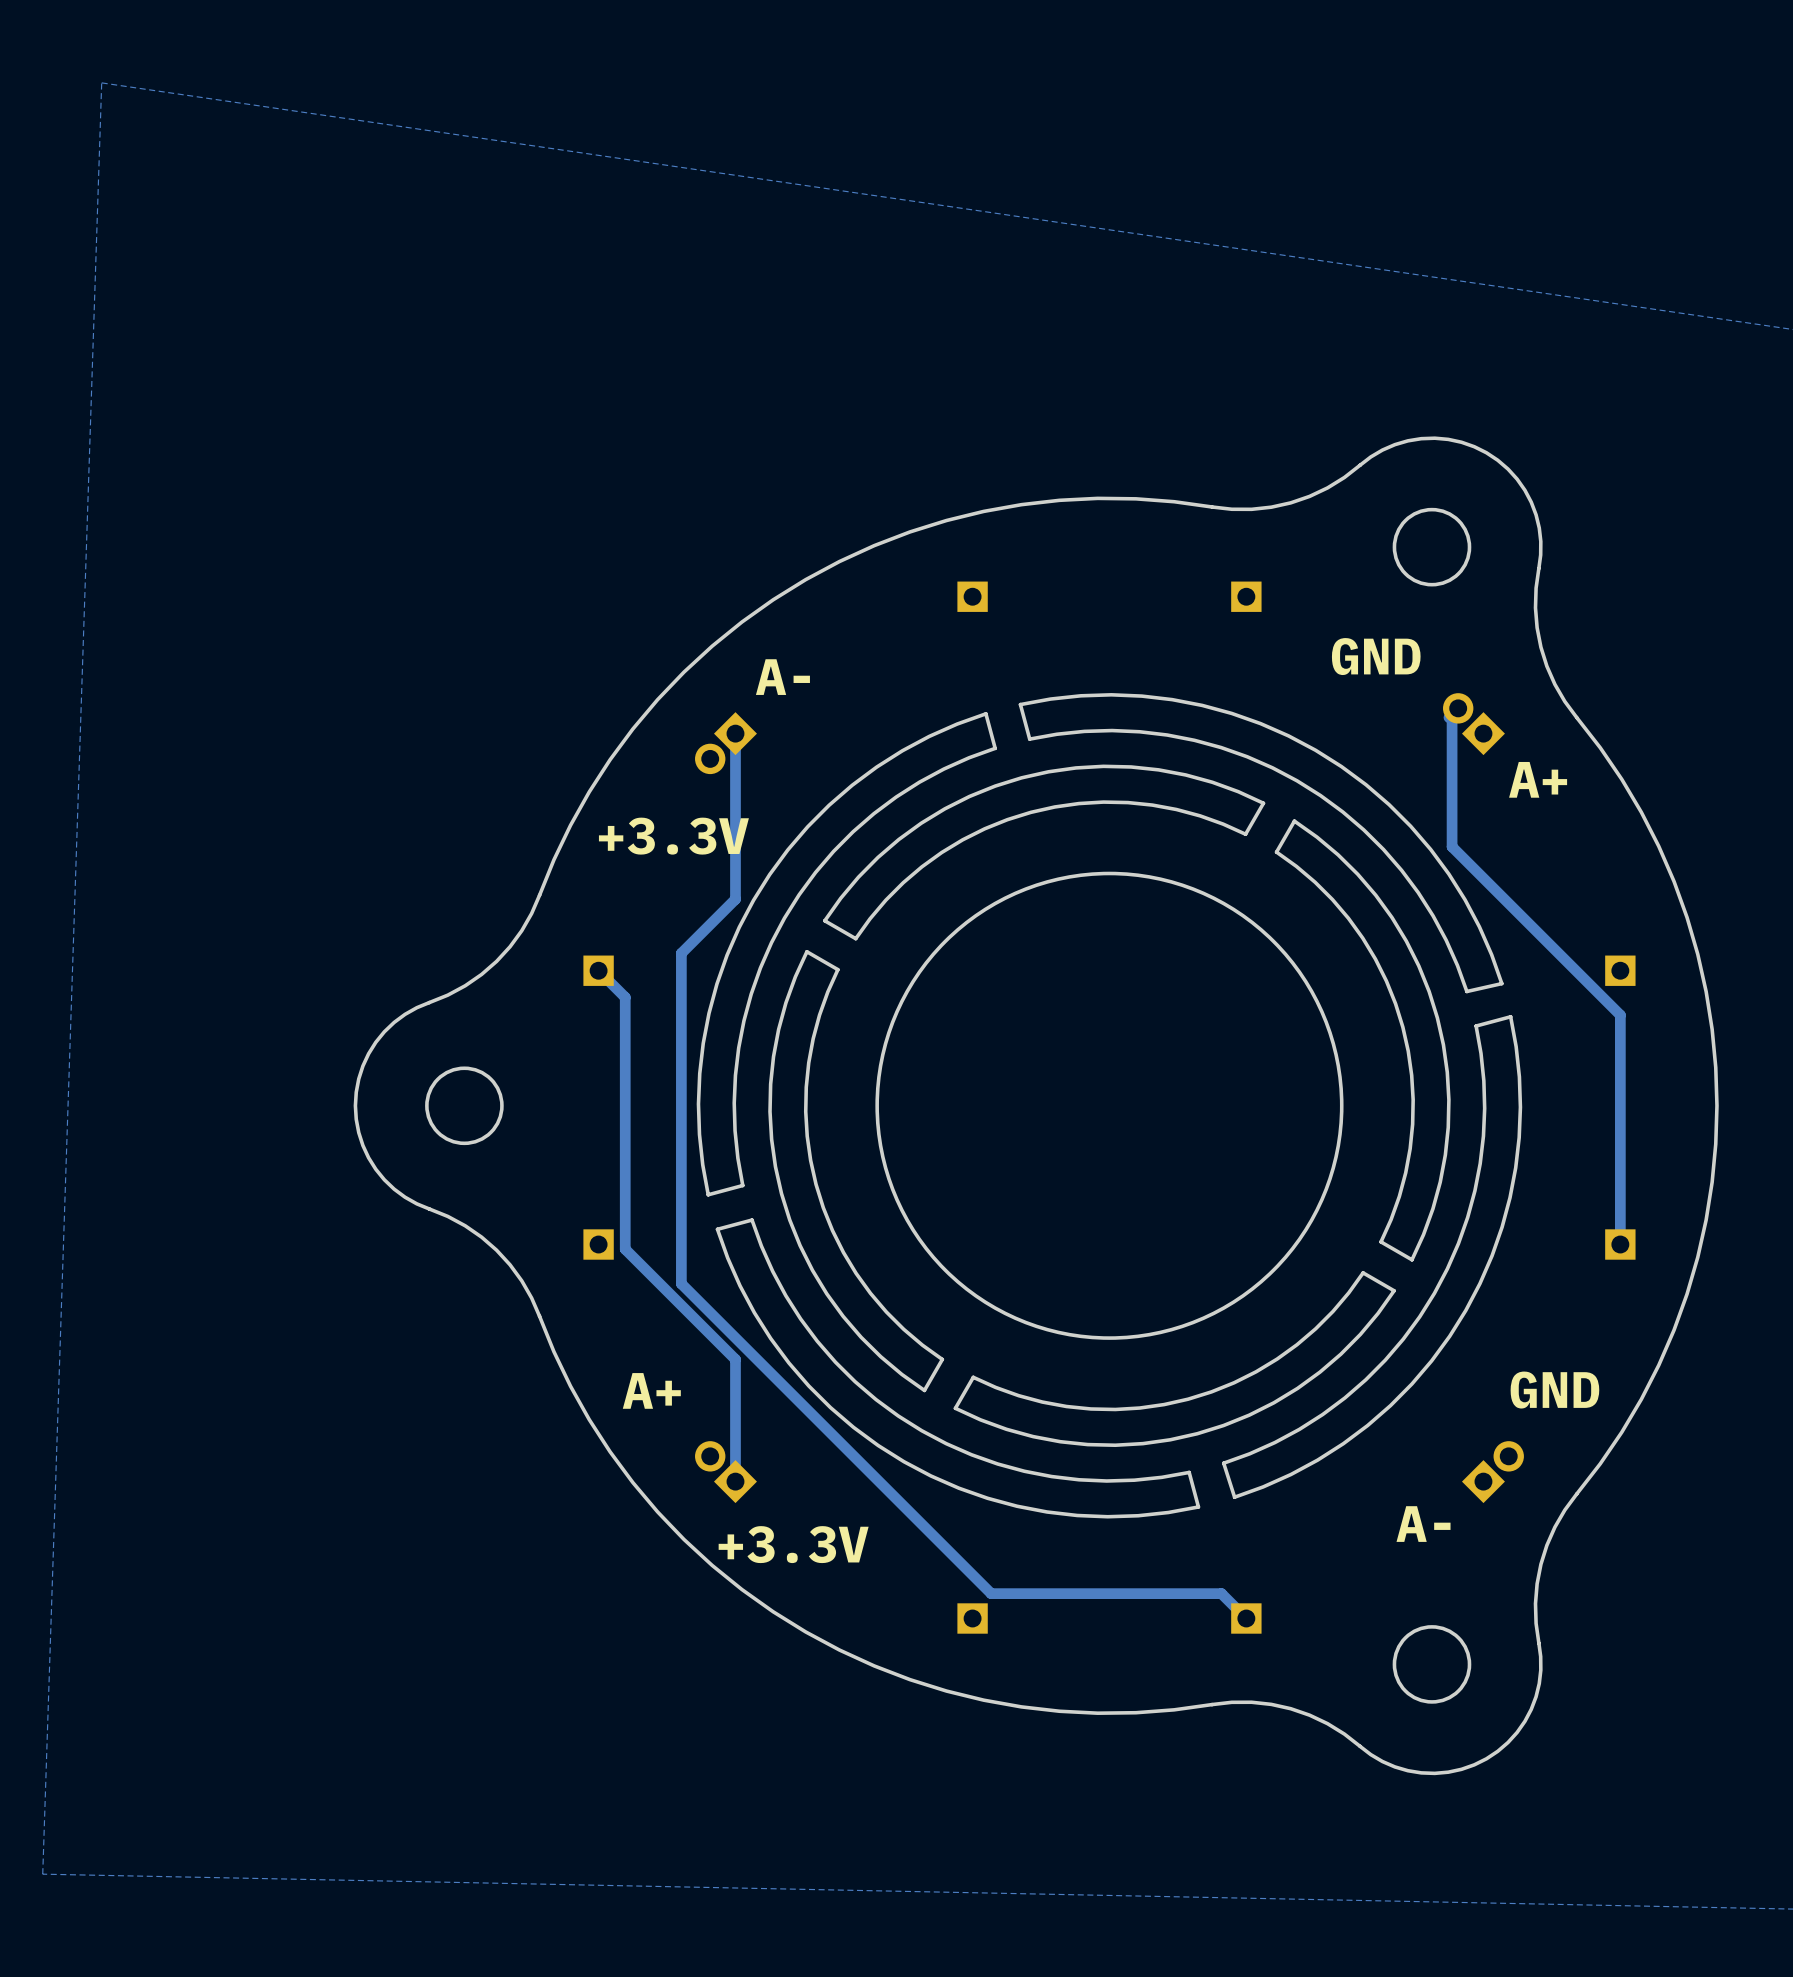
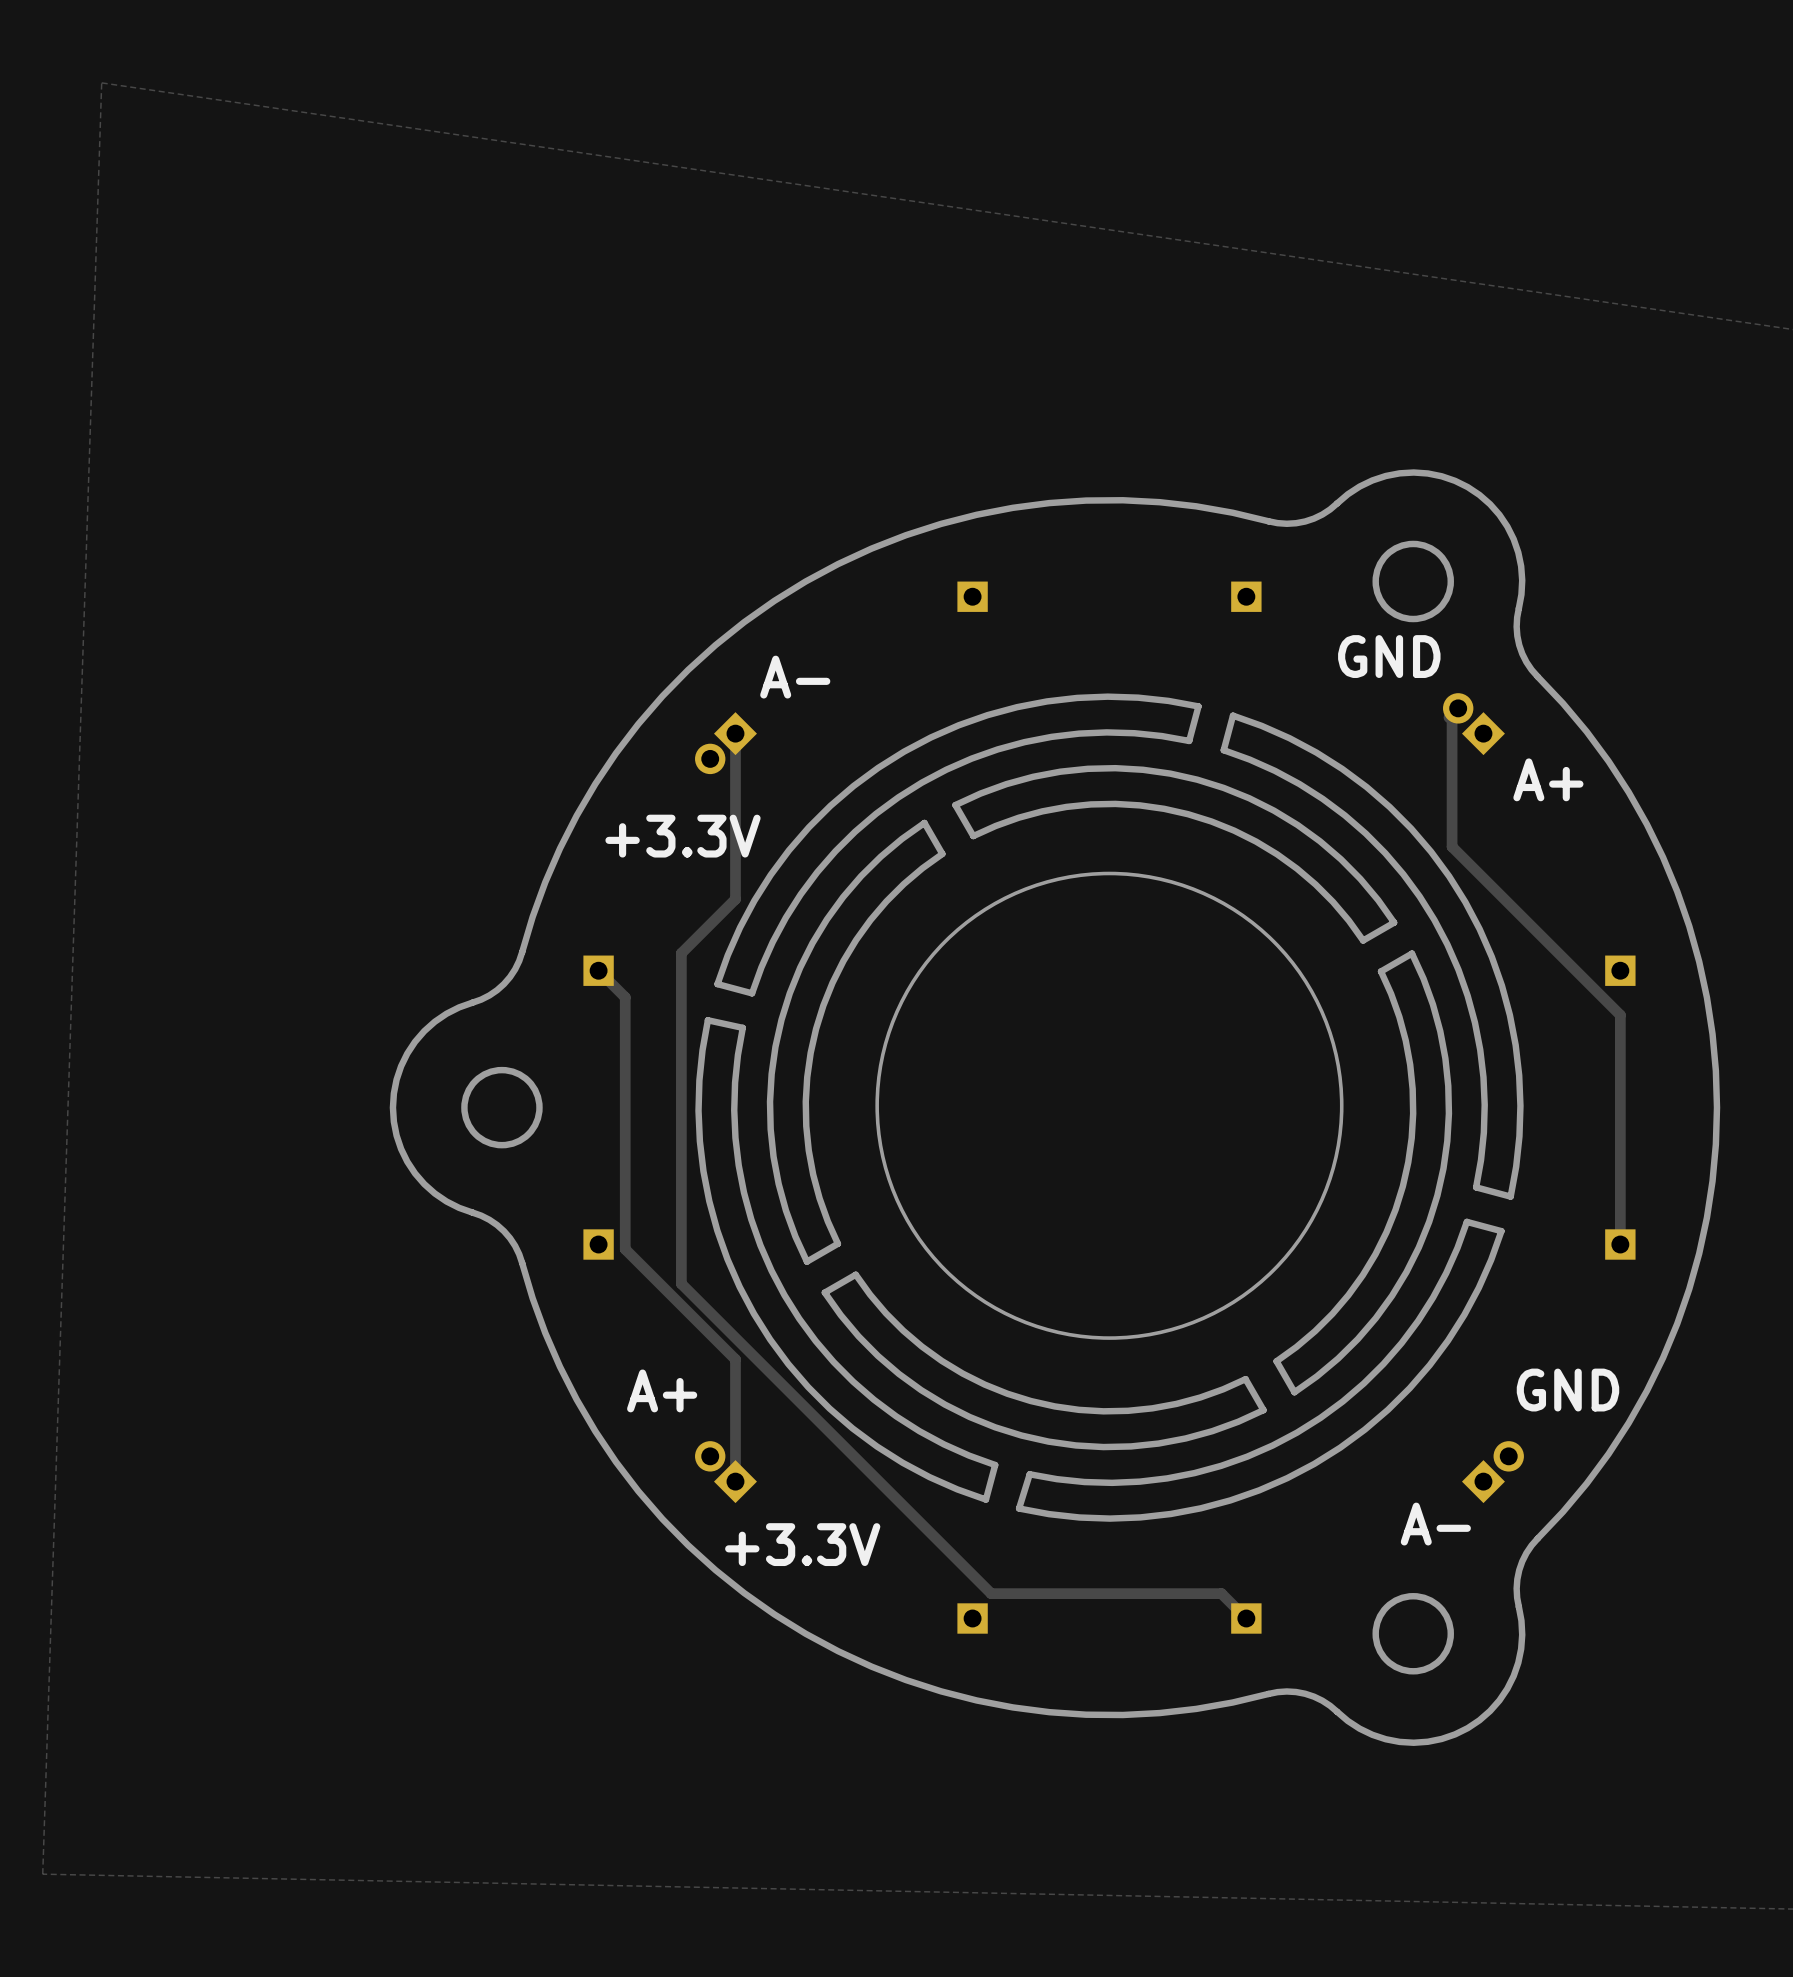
board edge: (1360, 465) (1382, 450) (1407, 440) (1421, 438) (1448, 439) (1474, 446) (1486, 452) (1508, 469) (1524, 490) (1536, 514) (1539, 528) (1540, 555) (1535, 607) (1537, 627) (1546, 666) (1564, 701) (1600, 747) (1641, 812) (1674, 881) (1697, 954) (1712, 1029) (1715, 1067) (1715, 1144) (1706, 1219) (1697, 1257) (1674, 1330) (1641, 1399) (1600, 1463) (1564, 1510) (1546, 1545) (1537, 1583) (1536, 1623) (1540, 1670) (1539, 1683) (1531, 1709) (1517, 1732) (1508, 1742) (1486, 1758) (1461, 1769) (1434, 1773) (1407, 1770) (1382, 1761) (1327, 1723) (1290, 1708) (1251, 1702) (1231, 1702) (1135, 1712) (1059, 1711) (1021, 1706) (983, 1700) (910, 1679) (839, 1650) (805, 1631) (741, 1589) (712, 1565) (657, 1511) (610, 1451) (589, 1419) (553, 1351) (531, 1298) (510, 1264) (496, 1250) (465, 1225) (405, 1197) (384, 1179) (375, 1169) (362, 1145) (358, 1132) (355, 1105) (358, 1078) (362, 1066) (375, 1042) (384, 1031) (405, 1014) (465, 985) (496, 961) (510, 946) (531, 913) (553, 859) (589, 791) (632, 728) (684, 672) (712, 646) (773, 599) (839, 561) (874, 545) (946, 520) (983, 511) (1059, 500) (1097, 498) (1174, 501) (1231, 509) (1271, 507) (1309, 496) (1327, 487) (1360, 465) -> (1337, 503) (1347, 494) (1372, 480) (1385, 476) (1413, 472) (1441, 476) (1467, 487) (1490, 504) (1499, 514) (1513, 539) (1521, 566) (1521, 594) (1516, 626) (1522, 653) (1531, 669) (1563, 703) (1608, 761) (1646, 824) (1677, 891) (1689, 926) (1706, 997) (1715, 1070) (1716, 1107) (1715, 1144) (1706, 1217) (1699, 1253) (1677, 1323) (1646, 1390) (1608, 1453) (1563, 1511) (1531, 1545) (1522, 1561) (1516, 1588) (1521, 1620) (1521, 1648) (1513, 1676) (1507, 1688) (1490, 1711) (1479, 1720) (1455, 1734) (1441, 1738) (1413, 1742) (1385, 1739) (1359, 1728) (1322, 1700) (1296, 1692) (1277, 1692) (1232, 1702) (1159, 1713) (1086, 1714) (1049, 1712) (976, 1700) (905, 1680) (838, 1651) (774, 1614) (715, 1570) (688, 1545) (638, 1491) (595, 1431) (559, 1366) (532, 1298) (519, 1254) (510, 1238) (489, 1219) (459, 1207) (434, 1193) (415, 1173) (407, 1161) (396, 1135) (392, 1107) (393, 1093) (401, 1066) (415, 1041) (434, 1021) (459, 1007) (489, 995) (510, 977) (519, 960) (532, 916) (559, 848) (595, 783) (638, 724) (688, 669) (715, 645) (774, 600) (805, 581) (838, 564) (905, 535) (976, 514) (1012, 507) (1086, 500) (1159, 502) (1196, 506) (1286, 523) (1313, 518) (1337, 503)
round board edge: [1392, 507, 1472, 587] -> none
round board edge: none -> [1372, 540, 1454, 623]
board edge: (1020, 704) (1029, 739) (1084, 731) (1112, 730) (1167, 735) (1221, 747) (1247, 756) (1297, 780) (1342, 811) (1363, 829) (1401, 870) (1418, 892) (1446, 940) (1466, 991) (1501, 983) (1479, 926) (1448, 873) (1430, 849) (1389, 804) (1365, 784) (1315, 750) (1260, 723) (1202, 705) (1172, 699) (1111, 694) (1080, 695) (1020, 704) -> none
board edge: none -> (1198, 706) (1189, 740) (1134, 733) (1106, 732) (1051, 736) (997, 749) (946, 769) (921, 782) (898, 797) (855, 831) (817, 872) (800, 894) (772, 942) (752, 993) (717, 984) (740, 927) (754, 900) (788, 850) (830, 805) (878, 767) (903, 751) (958, 725) (1017, 707) (1046, 701) (1077, 697) (1138, 697) (1198, 706)
board edge: (985, 713) (995, 748) (969, 757) (919, 782) (874, 813) (833, 851) (799, 894) (784, 918) (771, 942) (751, 994) (738, 1047) (734, 1103) (735, 1130) (742, 1185) (708, 1194) (699, 1134) (698, 1104) (703, 1043) (709, 1013) (727, 955) (753, 900) (769, 874) (807, 826) (852, 785) (876, 767) (929, 736) (985, 713) -> none
board edge: none -> (1233, 715) (1223, 750) (1275, 770) (1299, 784) (1344, 815) (1385, 853) (1403, 874) (1434, 920) (1447, 944) (1467, 995) (1480, 1049) (1483, 1077) (1483, 1132) (1476, 1187) (1510, 1196) (1516, 1166) (1520, 1105) (1515, 1045) (1501, 985) (1491, 957) (1465, 902) (1449, 876) (1411, 828) (1366, 787) (1316, 752) (1289, 738) (1233, 715)
board edge: (1263, 803) (1245, 834) (1200, 815) (1152, 805) (1103, 802) (1054, 806) (1030, 812) (984, 828) (941, 852) (903, 882) (885, 900) (855, 938) (824, 920) (858, 877) (877, 857) (921, 823) (969, 796) (1021, 777) (1075, 767) (1131, 766) (1185, 774) (1238, 791) (1263, 803) -> (955, 805) (1006, 784) (1060, 771) (1115, 768) (1170, 773) (1197, 779) (1249, 798) (1297, 825) (1320, 841) (1360, 878) (1394, 922) (1363, 940) (1332, 901) (1315, 884) (1277, 854) (1234, 830) (1188, 814) (1139, 805) (1115, 803) (1066, 806) (1018, 817) (973, 836) (955, 805)
board edge: (1294, 821) (1276, 852) (1315, 882) (1332, 899) (1362, 938) (1386, 981) (1402, 1027) (1411, 1075) (1412, 1124) (1410, 1148) (1399, 1196) (1380, 1241) (1411, 1259) (1432, 1208) (1445, 1154) (1448, 1099) (1447, 1072) (1437, 1017) (1418, 965) (1392, 917) (1357, 874) (1338, 854) (1294, 821) -> (1412, 953) (1432, 1004) (1440, 1031) (1448, 1085) (1447, 1141) (1437, 1195) (1418, 1247) (1392, 1295) (1375, 1318) (1338, 1358) (1294, 1392) (1276, 1361) (1315, 1331) (1348, 1295) (1362, 1275) (1386, 1232) (1402, 1186) (1411, 1138) (1412, 1089) (1410, 1064) (1399, 1016) (1381, 971) (1412, 953)
board edge: (806, 951) (837, 969) (827, 991) (813, 1038) (806, 1087) (807, 1136) (816, 1184) (823, 1207) (843, 1252) (870, 1293) (903, 1329) (942, 1359) (924, 1390) (880, 1356) (843, 1316) (812, 1270) (789, 1220) (781, 1193) (775, 1166) (770, 1111) (773, 1056) (785, 1002) (806, 951) -> (924, 822) (942, 853) (903, 884) (870, 920) (856, 939) (832, 982) (816, 1029) (807, 1077) (806, 1126) (813, 1174) (827, 1221) (837, 1243) (806, 1261) (785, 1210) (773, 1156) (770, 1129) (771, 1074) (781, 1019) (800, 967) (826, 919) (861, 876) (880, 856) (924, 822)
board edge: (1510, 1016) (1476, 1026) (1483, 1080) (1483, 1136) (1480, 1163) (1467, 1217) (1458, 1243) (1434, 1293) (1419, 1316) (1385, 1360) (1344, 1397) (1299, 1429) (1249, 1453) (1223, 1463) (1234, 1497) (1263, 1486) (1317, 1460) (1367, 1425) (1390, 1405) (1431, 1360) (1465, 1310) (1492, 1255) (1510, 1197) (1515, 1167) (1520, 1107) (1519, 1076) (1510, 1016) -> none
board edge: none -> (707, 1020) (742, 1027) (735, 1082) (735, 1137) (738, 1165) (751, 1219) (760, 1245) (784, 1295) (815, 1340) (833, 1362) (874, 1399) (919, 1431) (943, 1444) (995, 1465) (985, 1499) (957, 1489) (902, 1462) (852, 1428) (829, 1408) (788, 1364) (753, 1313) (727, 1259) (717, 1230) (703, 1171) (699, 1141) (699, 1080) (707, 1020)
round board edge: [425, 1066, 504, 1146] -> none
round board edge: none -> [461, 1066, 543, 1149]
board edge: (752, 1220) (717, 1229) (727, 1258) (754, 1312) (770, 1338) (808, 1386) (853, 1427) (878, 1445) (930, 1475) (958, 1488) (987, 1498) (1046, 1511) (1107, 1516) (1138, 1515) (1198, 1507) (1189, 1472) (1134, 1480) (1079, 1479) (1051, 1476) (1024, 1471) (971, 1454) (946, 1443) (898, 1416) (855, 1381) (817, 1341) (785, 1295) (772, 1271) (752, 1220) -> none
board edge: none -> (1466, 1221) (1501, 1231) (1478, 1287) (1464, 1314) (1429, 1365) (1409, 1388) (1364, 1429) (1340, 1447) (1314, 1463) (1259, 1490) (1200, 1508) (1140, 1517) (1110, 1518) (1049, 1514) (1019, 1508) (1029, 1474) (1056, 1479) (1112, 1482) (1167, 1478) (1194, 1473) (1247, 1456) (1272, 1445) (1320, 1417) (1363, 1383) (1401, 1343) (1433, 1297) (1446, 1273) (1466, 1221)
board edge: (1363, 1272) (1394, 1290) (1360, 1334) (1319, 1372) (1297, 1388) (1249, 1415) (1223, 1425) (1197, 1433) (1142, 1443) (1087, 1444) (1033, 1436) (980, 1419) (955, 1408) (973, 1377) (1018, 1395) (1042, 1402) (1090, 1408) (1139, 1408) (1164, 1404) (1211, 1391) (1256, 1371) (1296, 1344) (1332, 1311) (1363, 1272) -> (855, 1274) (885, 1313) (921, 1346) (962, 1373) (1007, 1393) (1054, 1406) (1103, 1411) (1128, 1410) (1152, 1408) (1200, 1397) (1245, 1379) (1263, 1410) (1212, 1431) (1185, 1438) (1131, 1446) (1075, 1445) (1048, 1441) (995, 1427) (944, 1404) (921, 1390) (898, 1373) (858, 1336) (824, 1292) (855, 1274)
round board edge: none -> [1372, 1593, 1454, 1675]
round board edge: [1392, 1625, 1472, 1704] -> none

